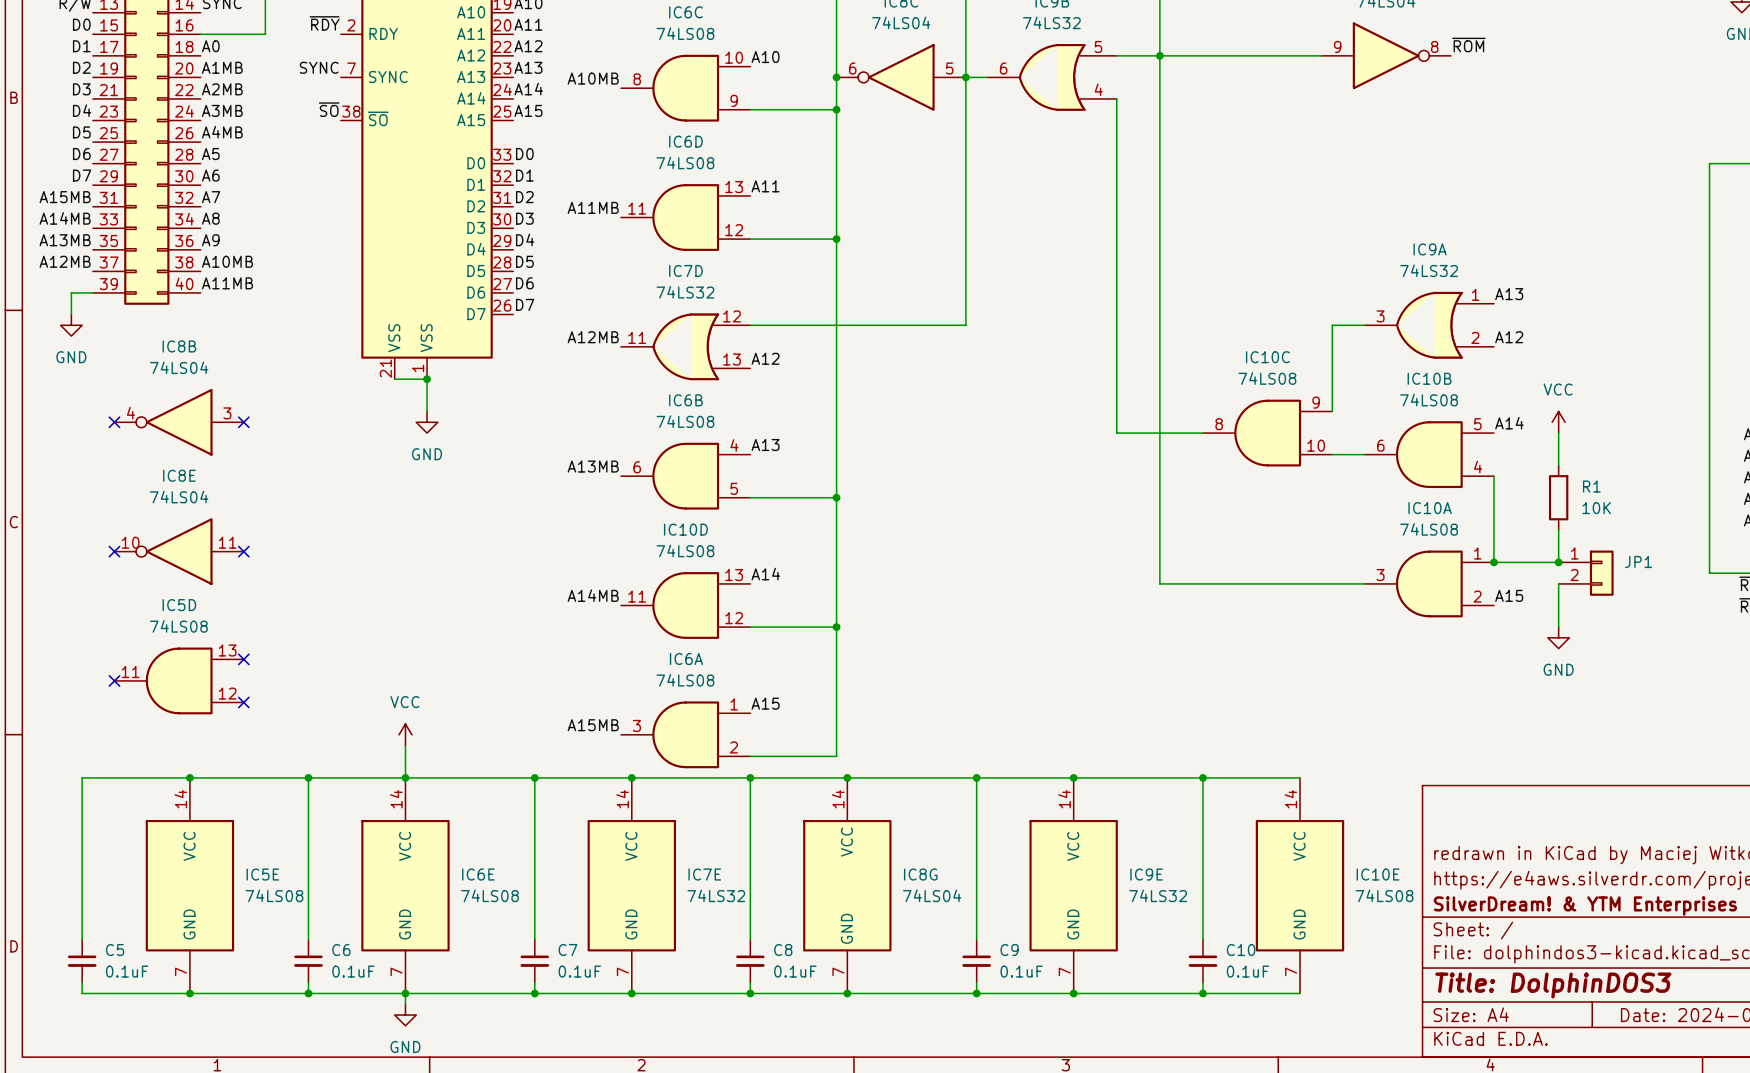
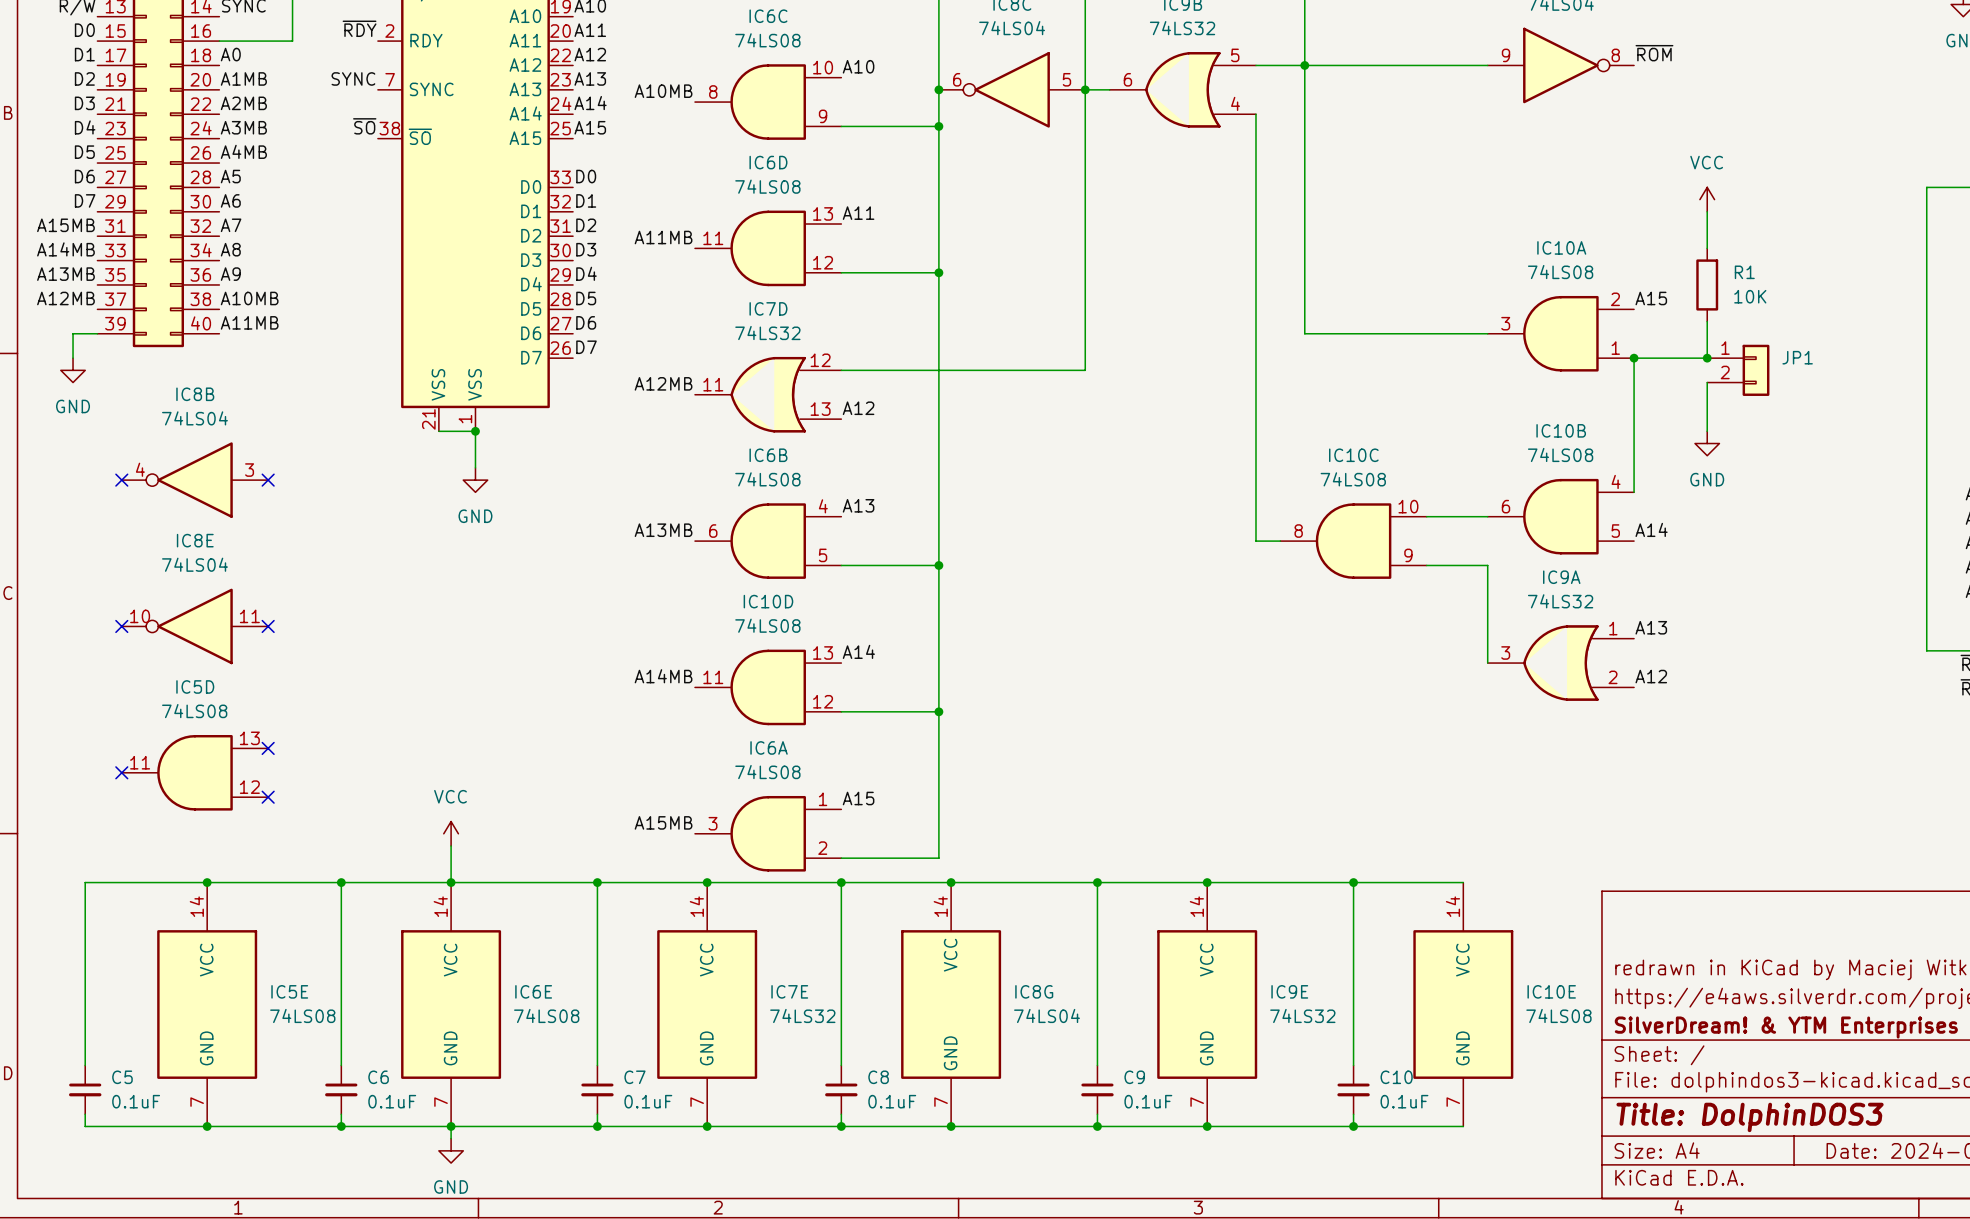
power symbol: none -> VCC (1707, 199)
wire: none -> (1707, 211) (1707, 248)
label: none -> A15 (1651, 298)
wire: none -> (1707, 321) (1707, 358) (1634, 358) (1634, 492)
wire: (1159, 292) (1159, 583) (1364, 583) -> (1304, 333) (1487, 333)
label: A13 (1509, 294) -> none
junction: none -> (1634, 358)
junction: none -> (1707, 358)
wire: (1364, 325) (1332, 325) (1332, 411) -> none
IC9A position: (1429, 325) -> (1560, 663)
wire: none -> (1707, 382) (1707, 431)
label: A12 (1509, 337) -> none
power symbol: none -> GND (1707, 443)
power symbol: VCC (1558, 422) -> none
label position: A14 (1509, 423) -> A14 (1651, 529)
wire: (1116, 433) (1202, 433) -> (1255, 492) (1255, 541) (1280, 541)
IC10C flip: as is (1267, 433) -> up-down (1353, 541)
IC10C position: (1267, 433) -> (1353, 541)
wire: (1558, 433) (1558, 465) -> none
IC10B flip: as is (1429, 454) -> up-down (1560, 516)
wire: (1493, 476) (1493, 562) (1558, 562) (1558, 530) -> none
wire: none -> (1426, 565) (1487, 565) (1487, 663)
R1 position: (1558, 497) -> (1707, 284)
label: none -> A13 (1651, 627)
junction: (1493, 562) -> none
junction: (1558, 562) -> none
JP1 position: (1586, 573) -> (1738, 370)
IC10A flip: as is (1429, 583) -> up-down (1560, 333)
IC10A position: (1429, 583) -> (1560, 333)
wire: (1558, 583) (1558, 627) -> none
label: none -> A12 (1651, 676)
label: A15 (1509, 595) -> none
power symbol: GND (1558, 637) -> none

